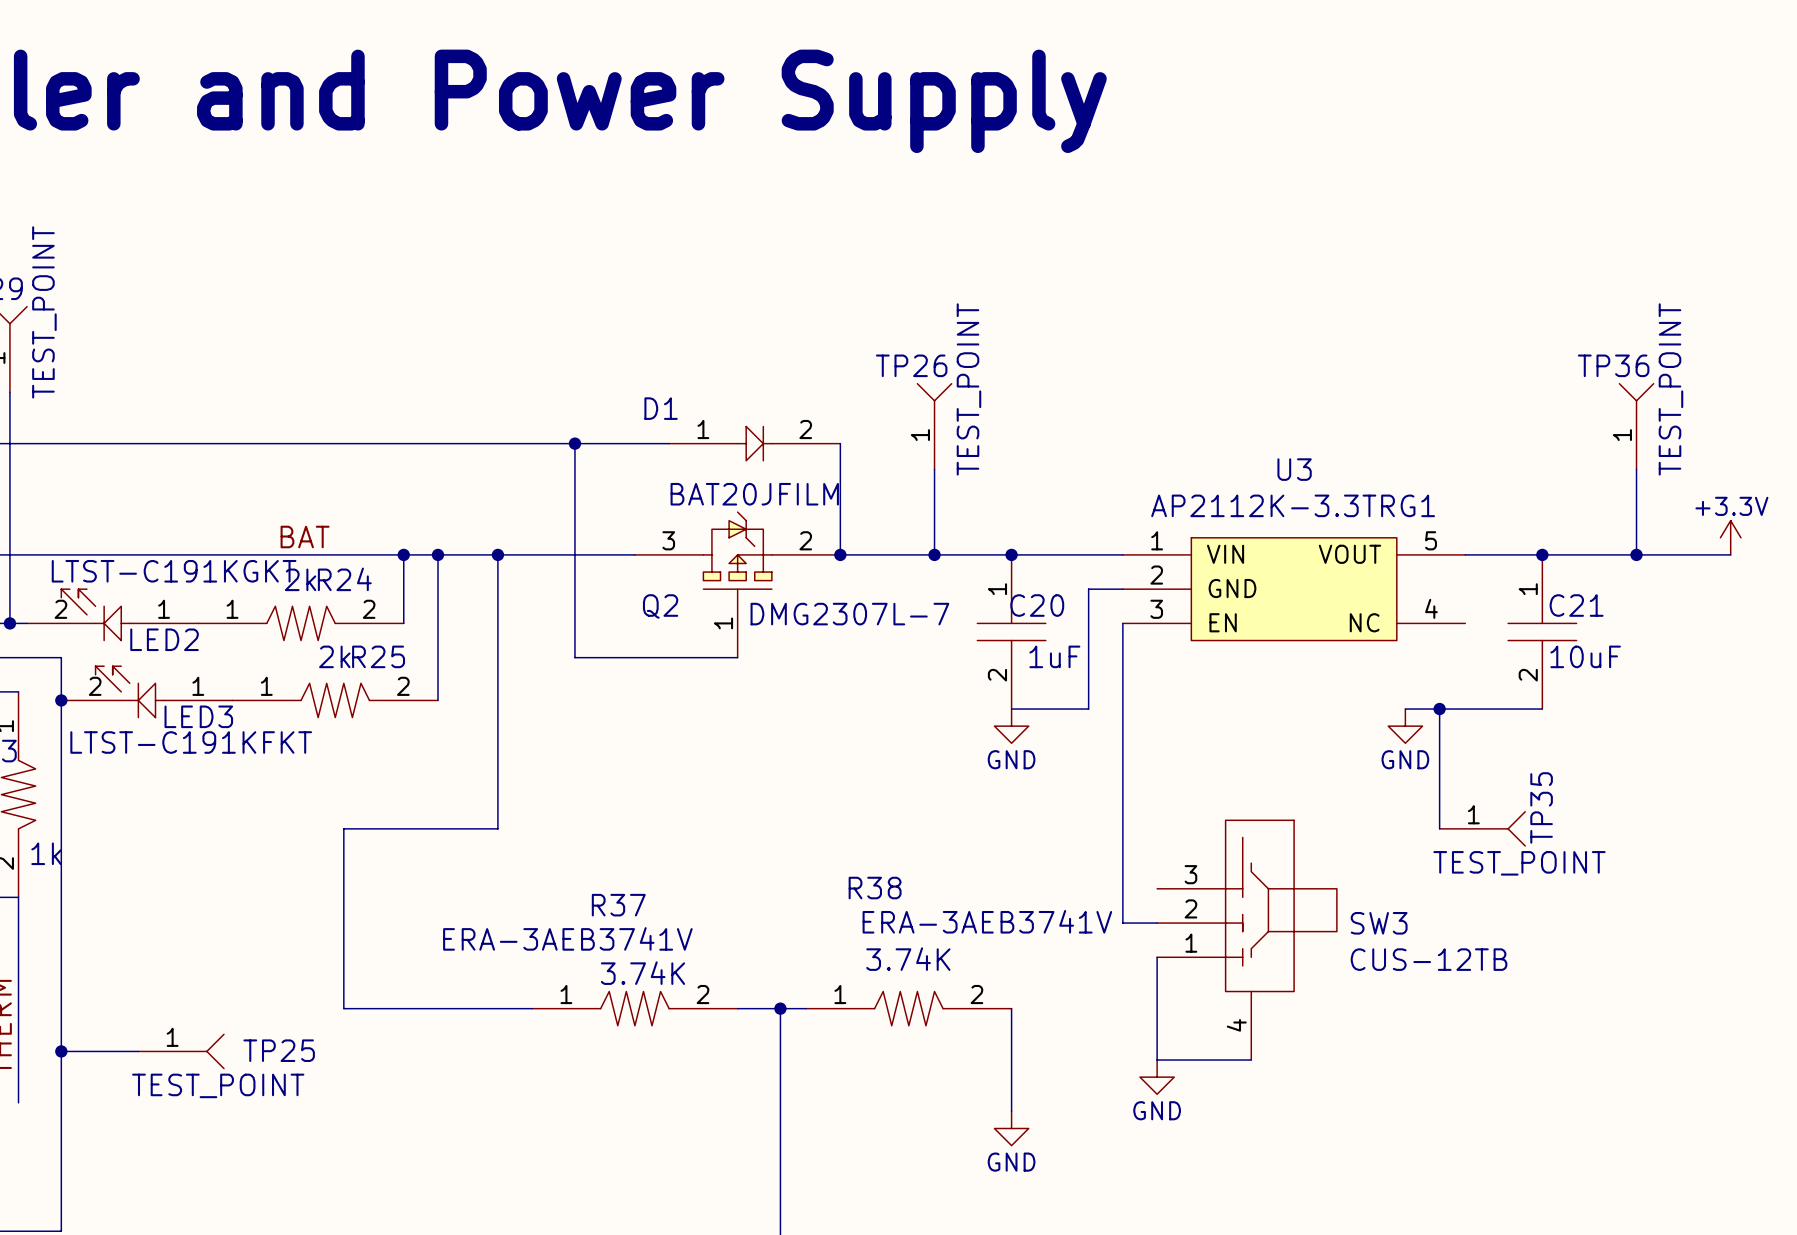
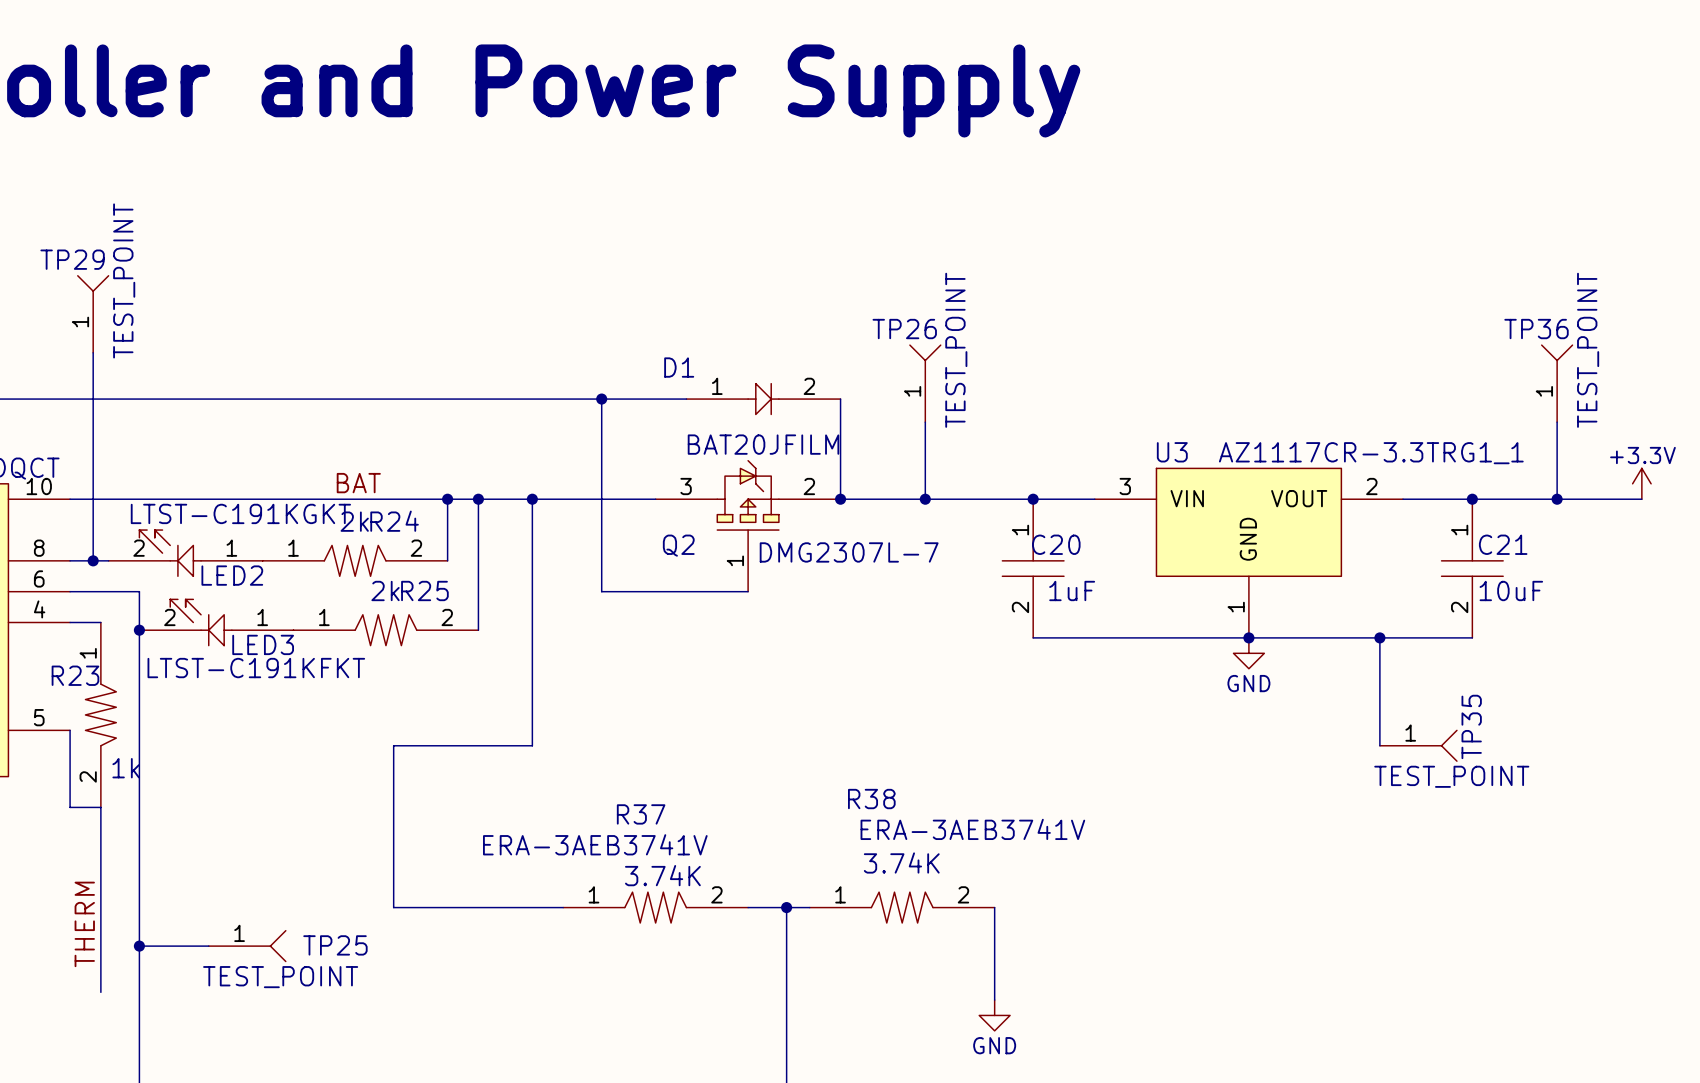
U3 name position: U3 (1294, 469) -> U3 (1172, 452)
U3 value: AP2112K-3.3TRG1 (1293, 505) -> AZ1117CR-3.3TRG1_1 (1371, 453)
U3 symbol: [1122, 537, 1466, 641] -> [1094, 468, 1404, 638]
junction position: (1011, 554) -> (1033, 499)
wire: (1122, 589) (1088, 589) (1088, 709) -> (1349, 637) (1064, 637)
wire: (1122, 623) (1122, 923) (1157, 923) -> none
C20 position: (1011, 631) -> (1033, 568)
wire: (1011, 709) (1054, 709) -> none
junction: none -> (1248, 637)
power symbol: GND (1011, 726) -> none
power symbol position: GND (1405, 726) -> GND (1248, 653)
SW3: CUS-12TB (1247, 940) -> none
wire: (1157, 957) (1157, 1060) (1251, 1060) -> none
power symbol: GND (1157, 1077) -> none

